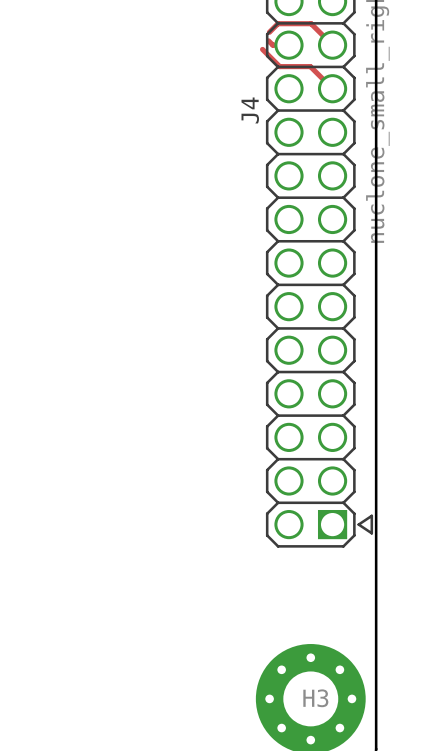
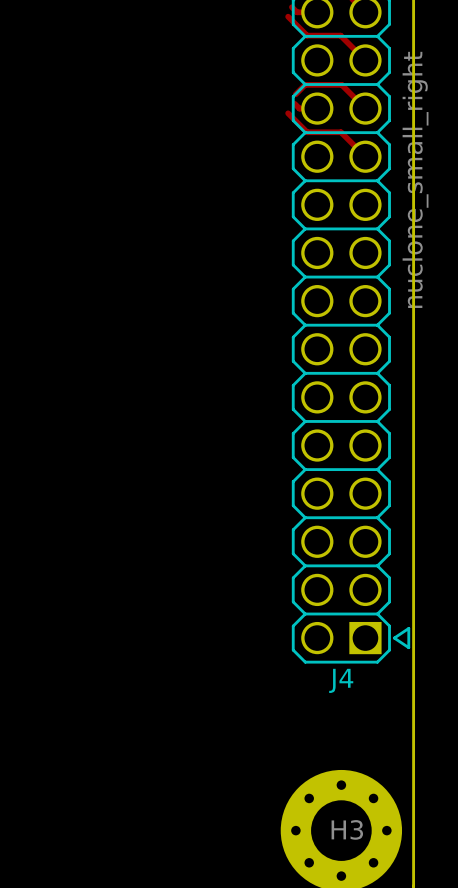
J4 name rotation: 0° (250, 110) -> 90° clockwise (341, 680)
J4 name position: J4 (250, 110) -> J4 (341, 680)

